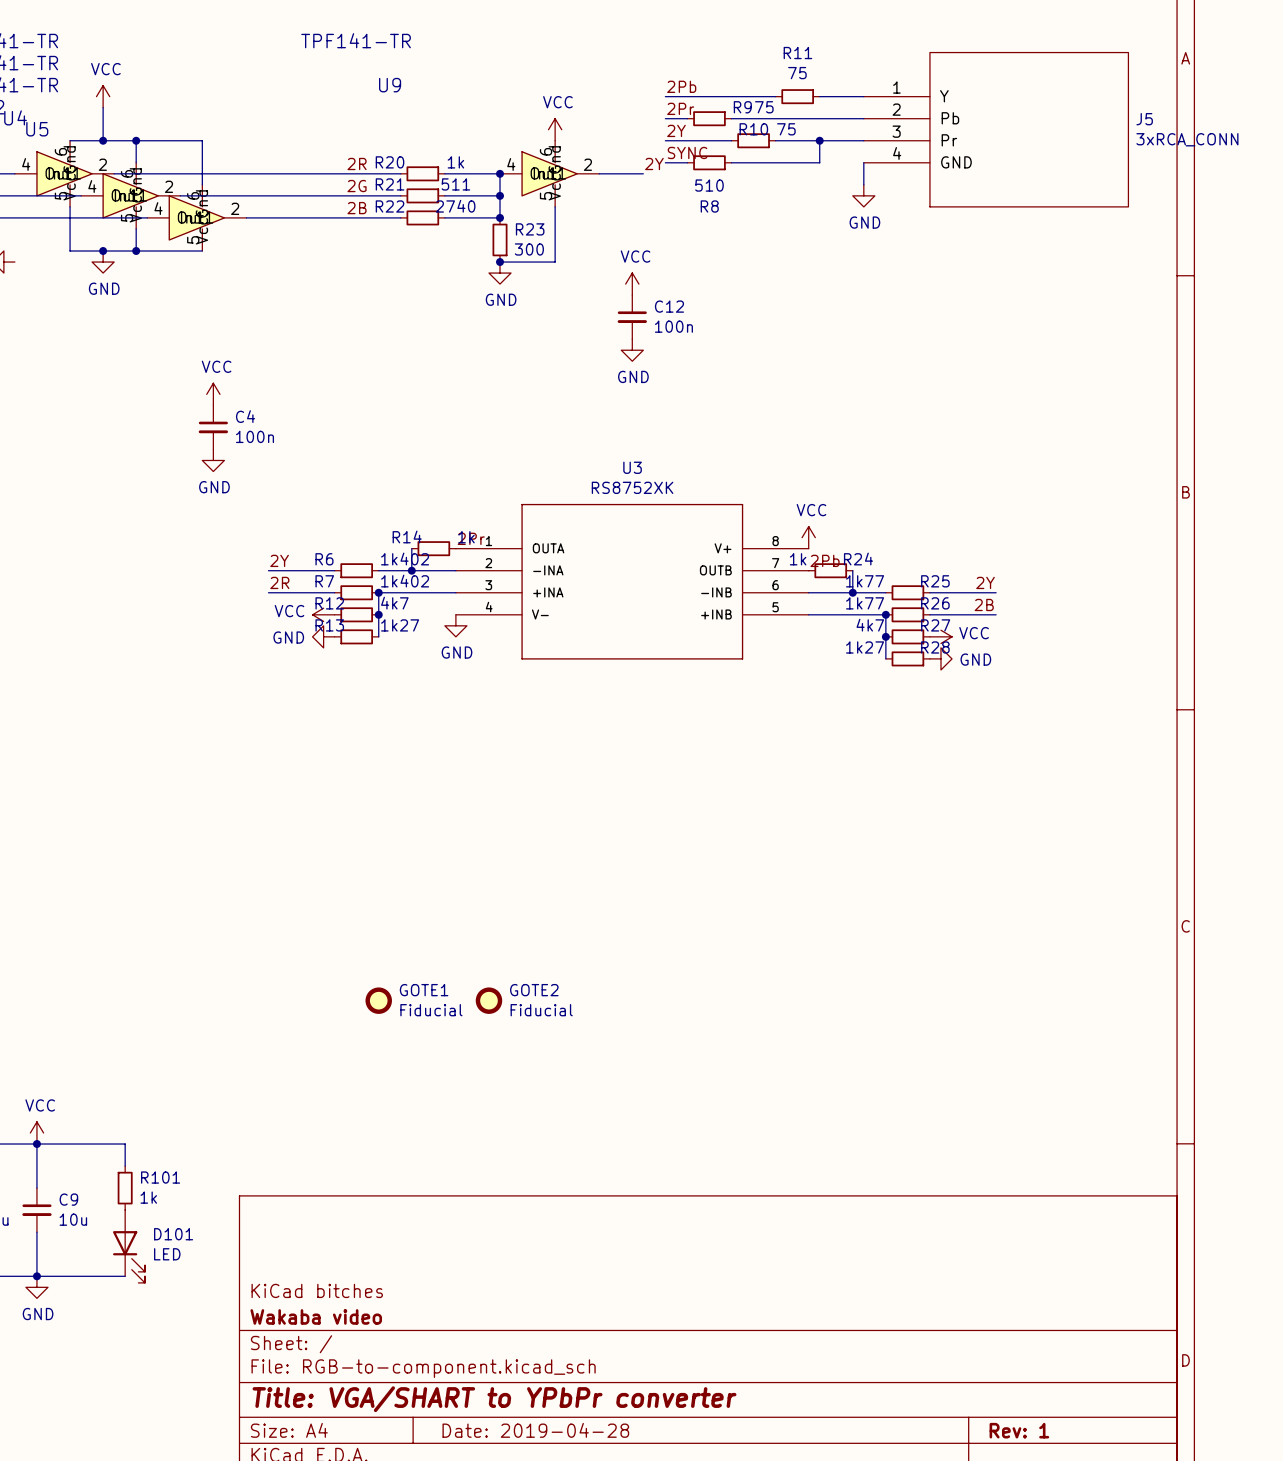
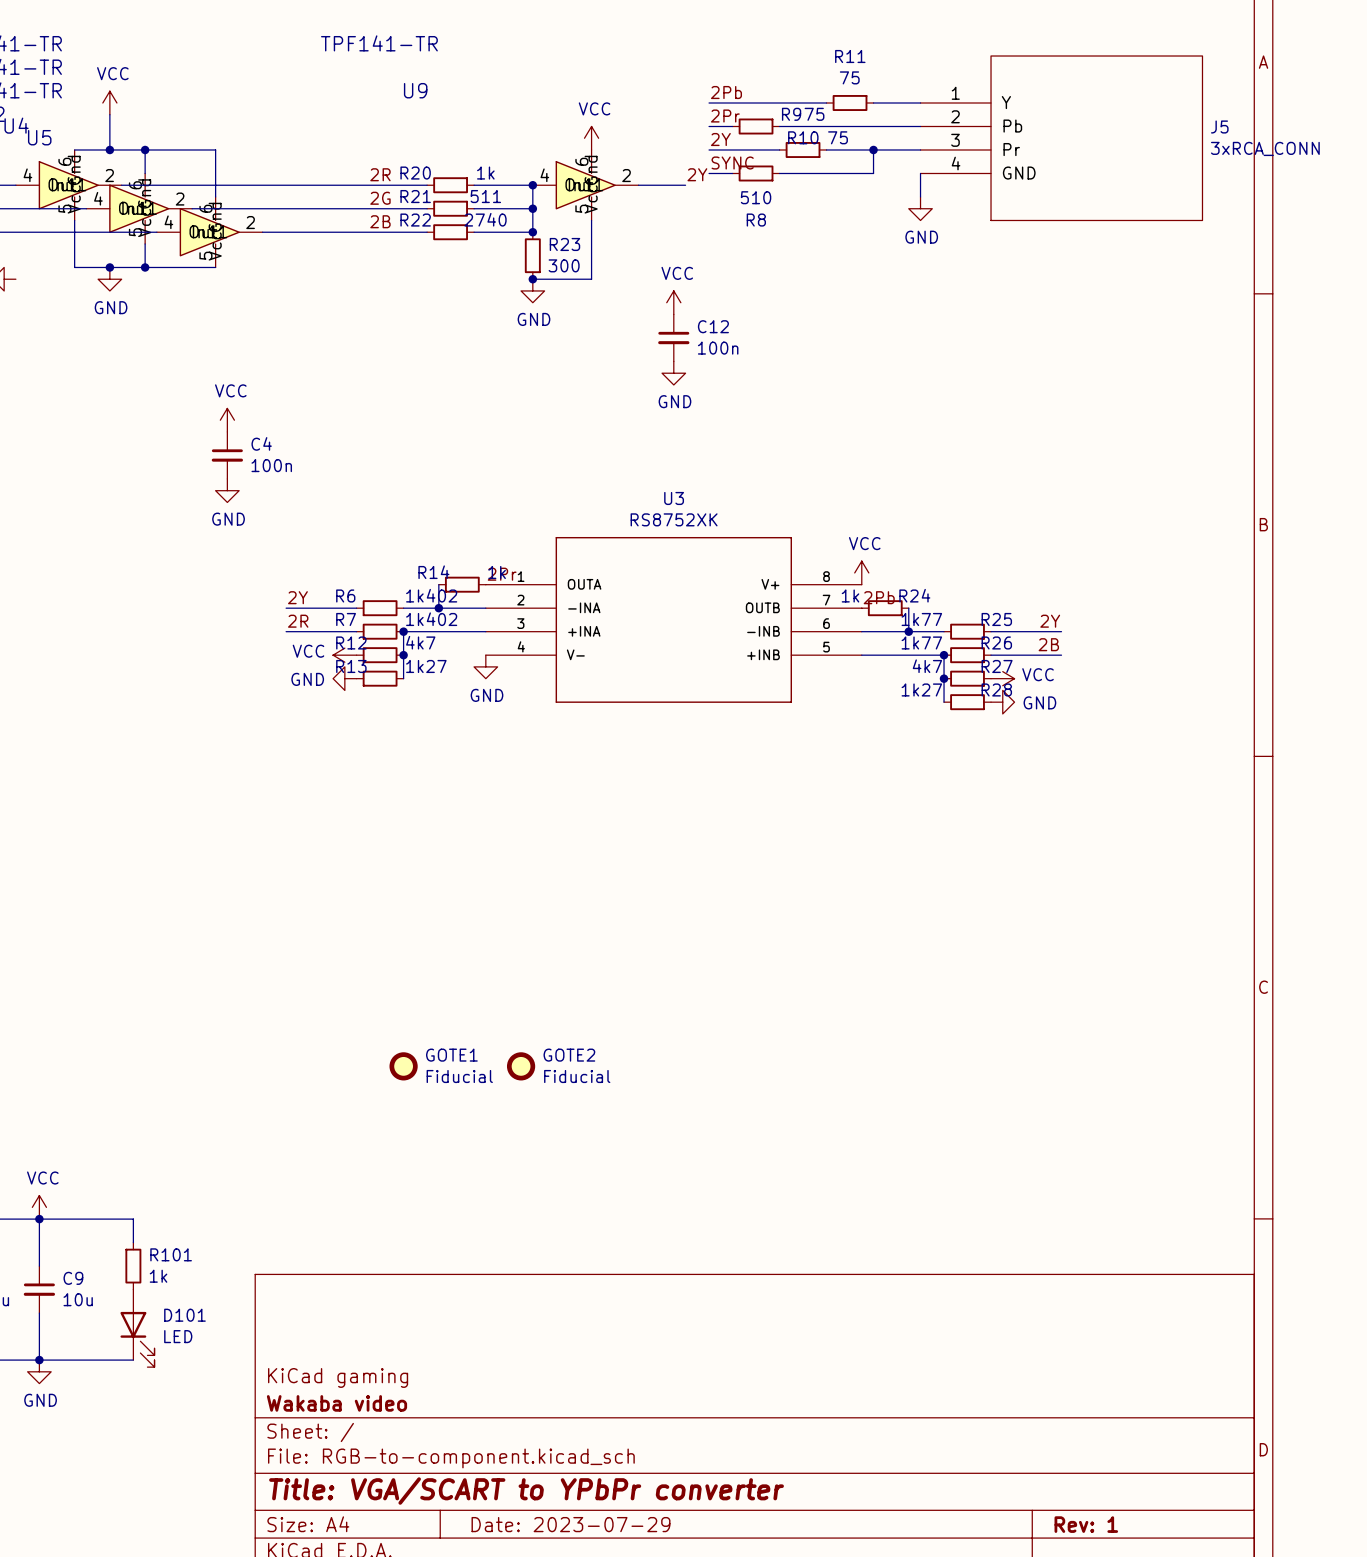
title block: KiCad bitches (317, 1290) -> KiCad gaming (338, 1377)
title block: Title: VGA/SHART to YPbPr converter (494, 1399) -> Title: VGA/SCART to YPbPr converter (526, 1491)
title block: Date: 2019-04-28 (535, 1430) -> Date: 2023-07-29 (570, 1524)

